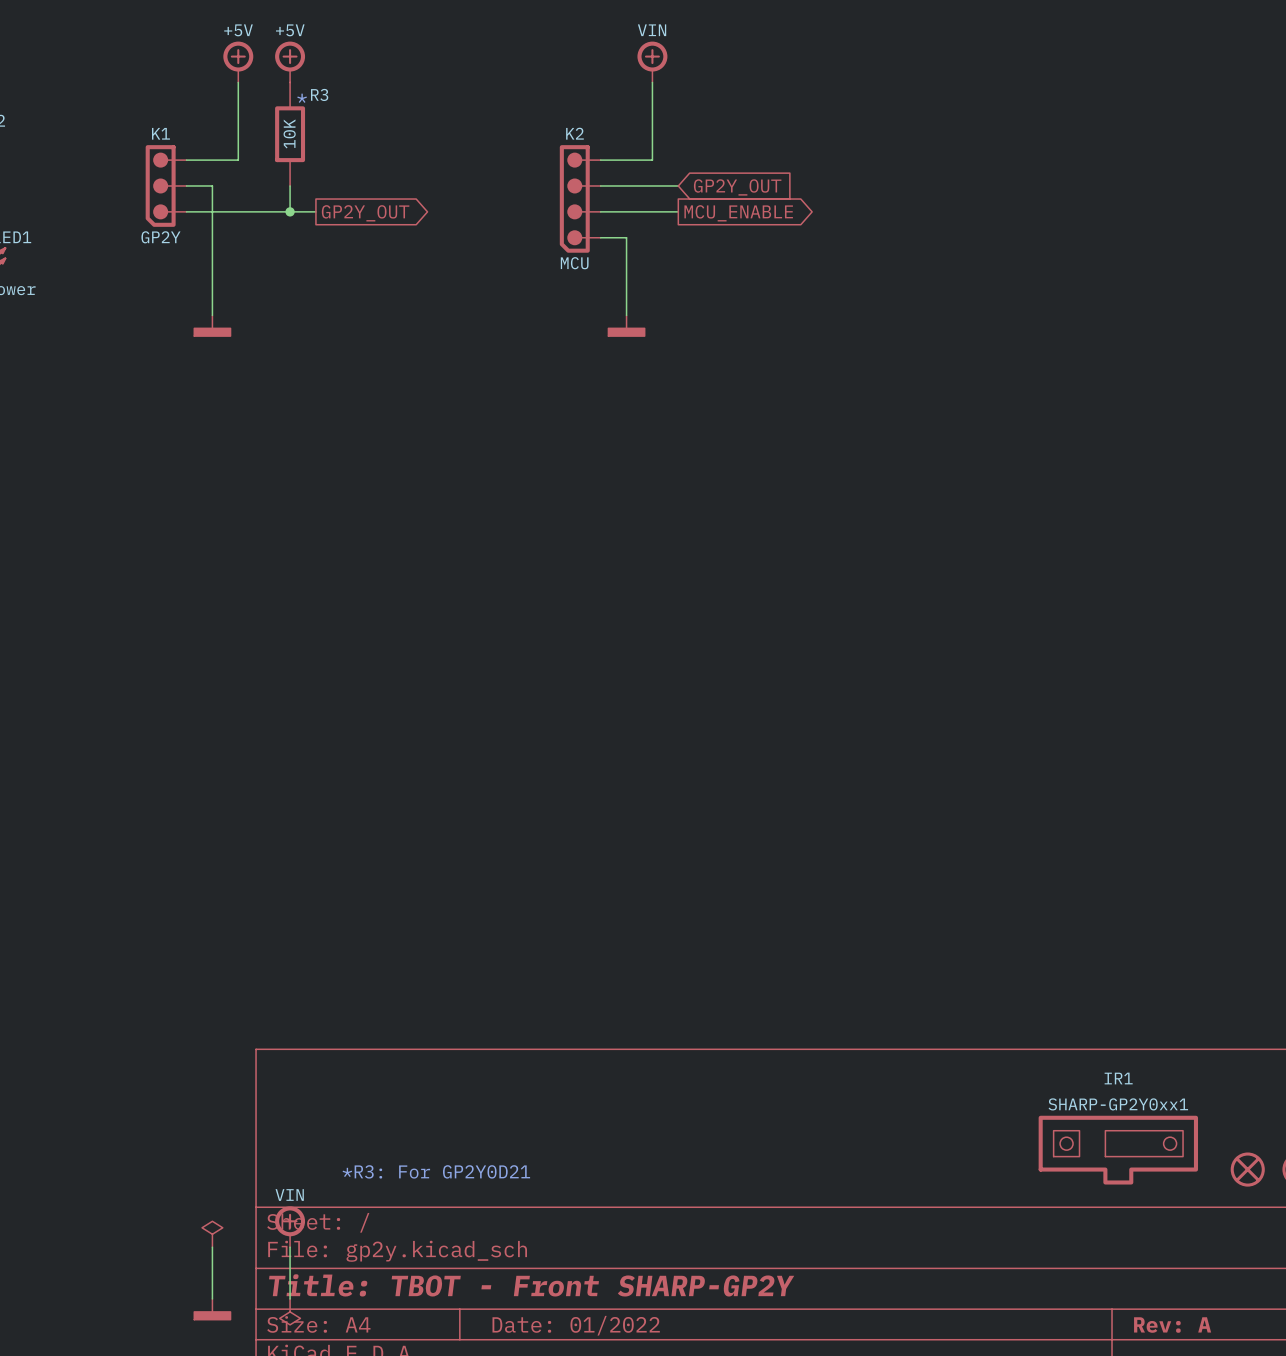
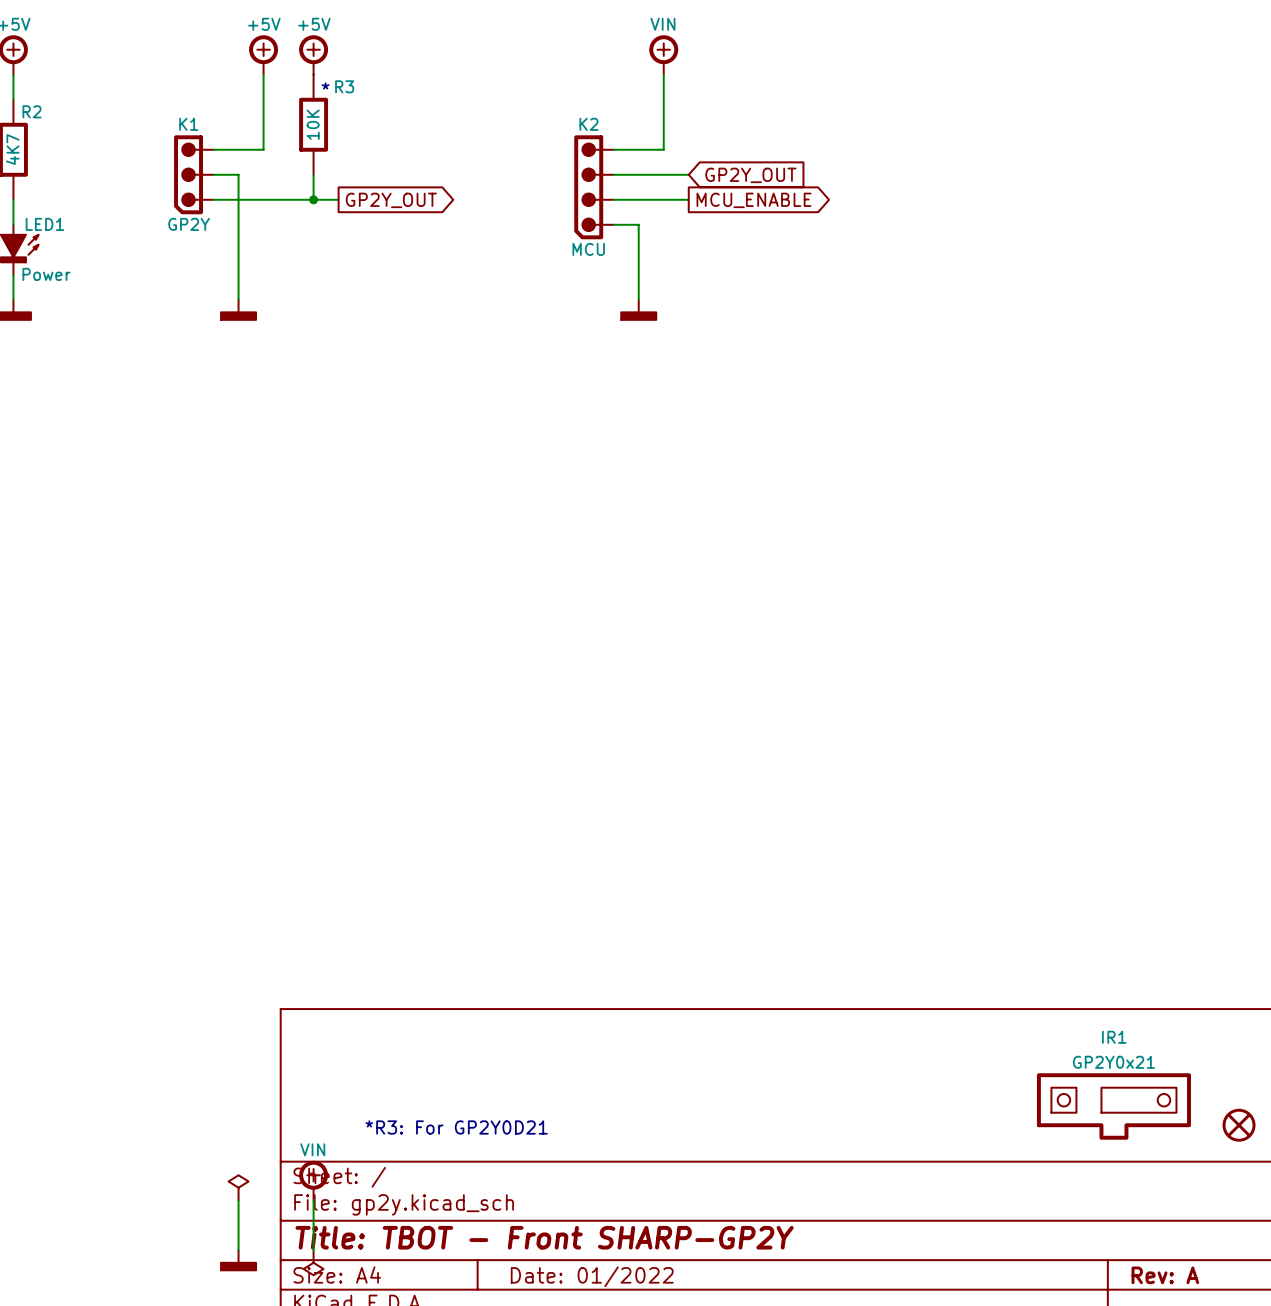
IR1 text: none -> GP2Y0x21 (1113, 1062)
IR1 value: SHARP-GP2Y0xx1 (1118, 1104) -> none

